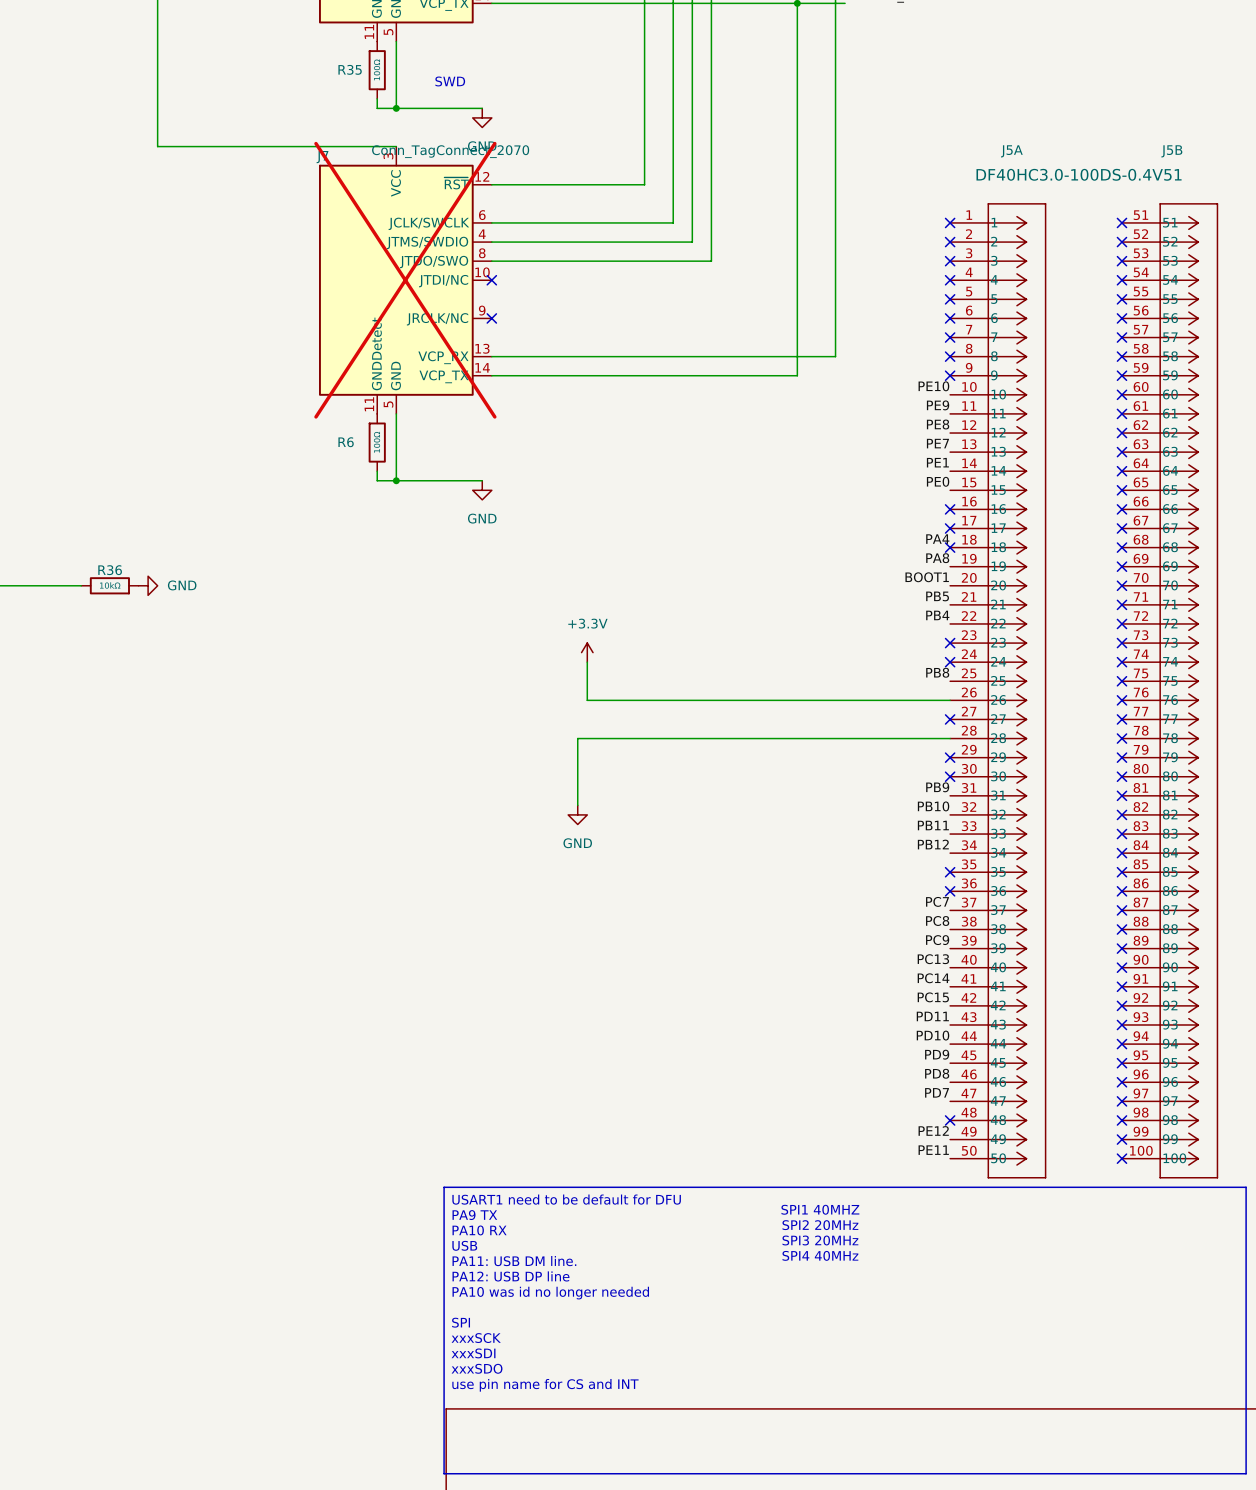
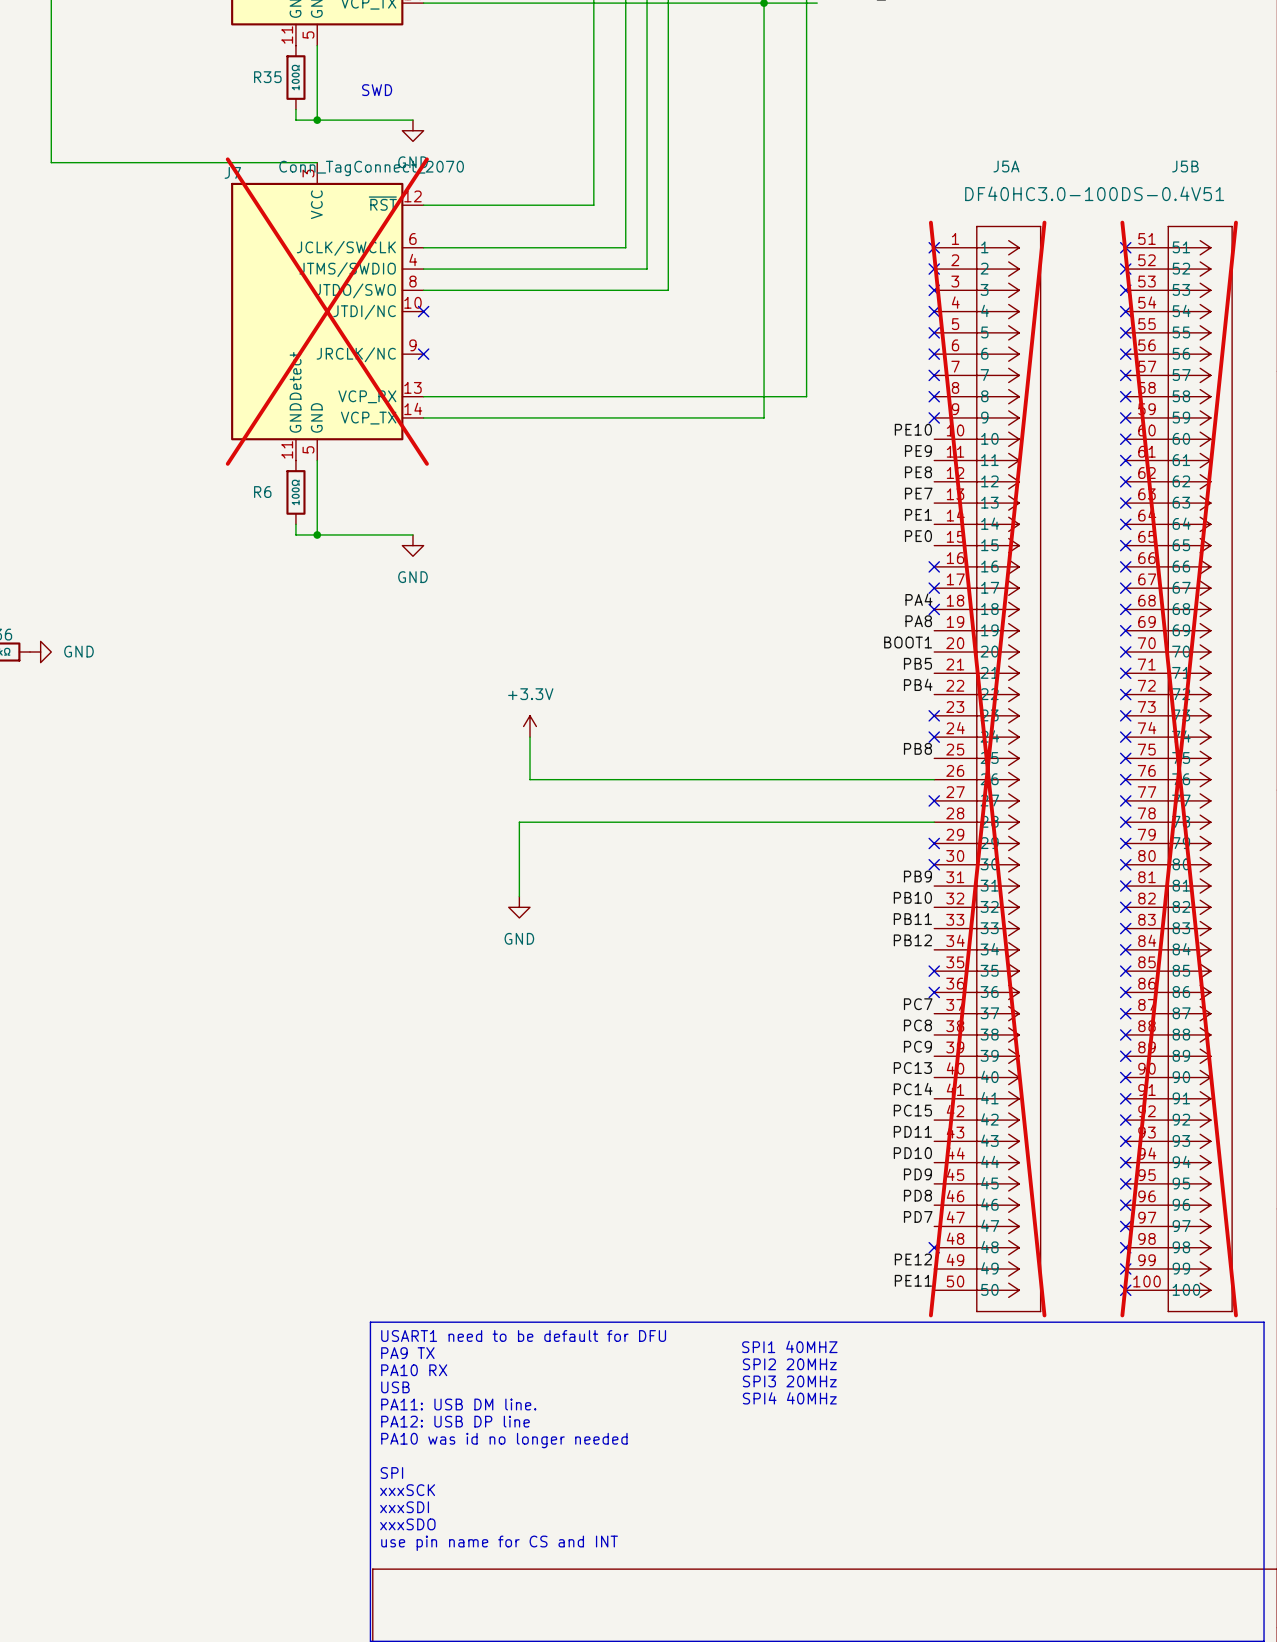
J5A do-not-place cross: none -> (987, 769)
J5B do-not-place cross: none -> (1179, 769)

